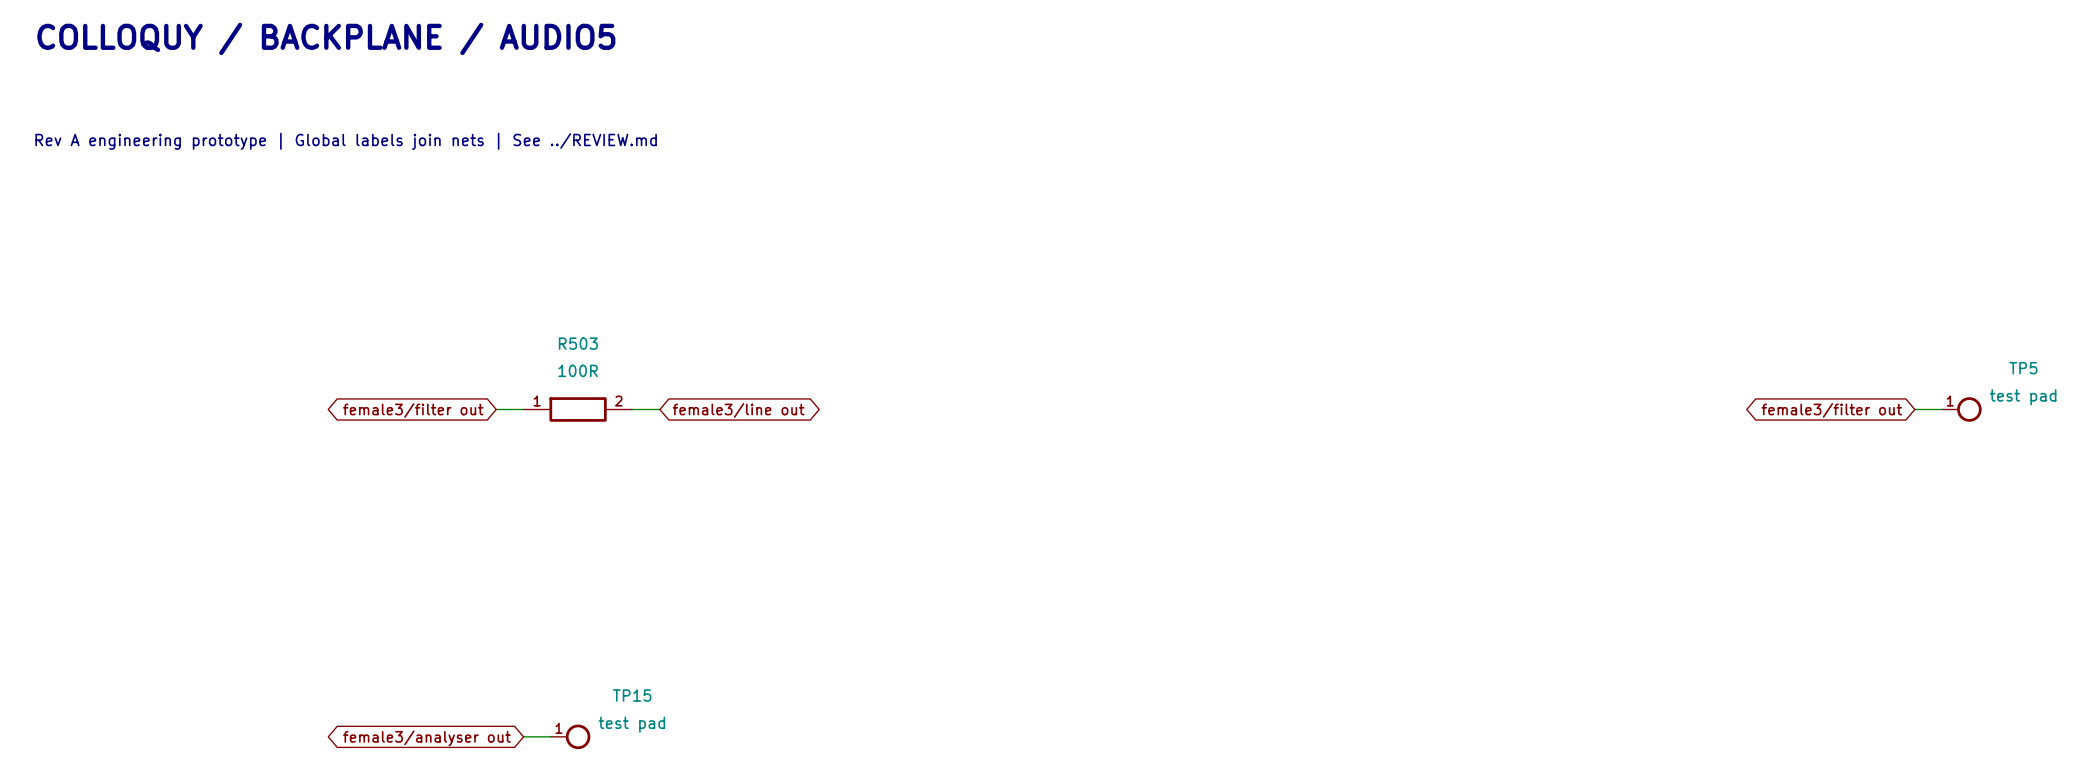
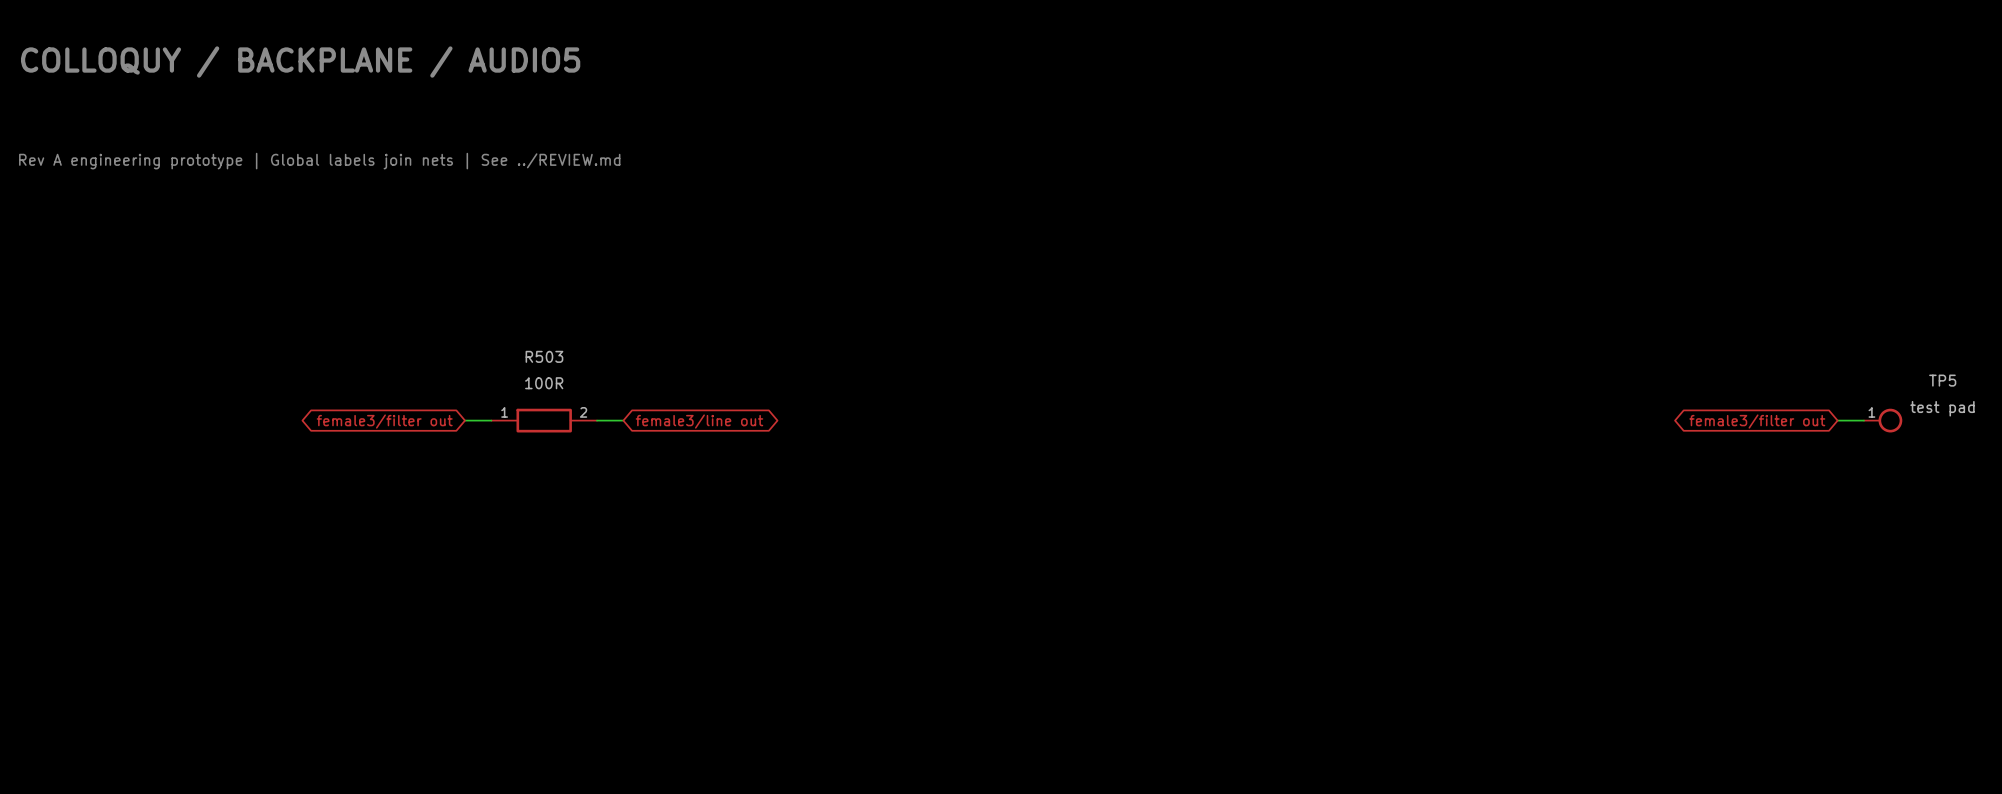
wire: (523, 736) (550, 736) -> none
TP15: test pad (570, 736) -> none
global label: female3/analyser out (426, 738) -> none

